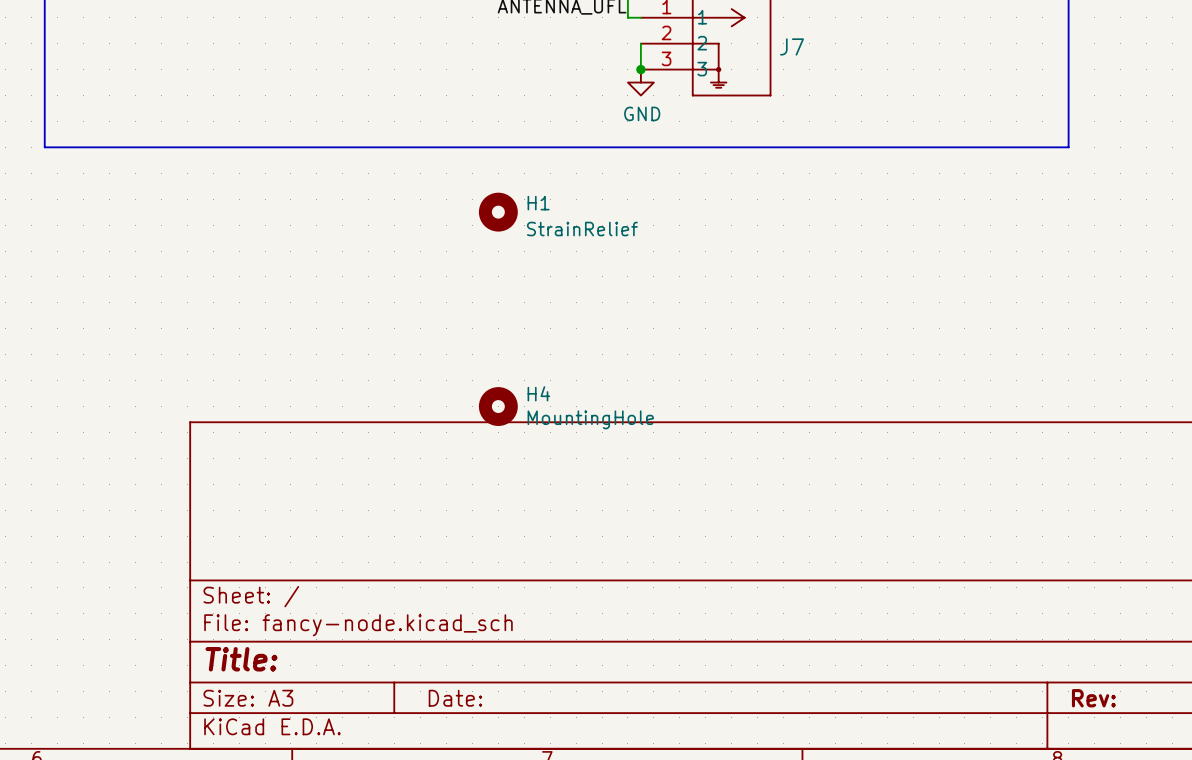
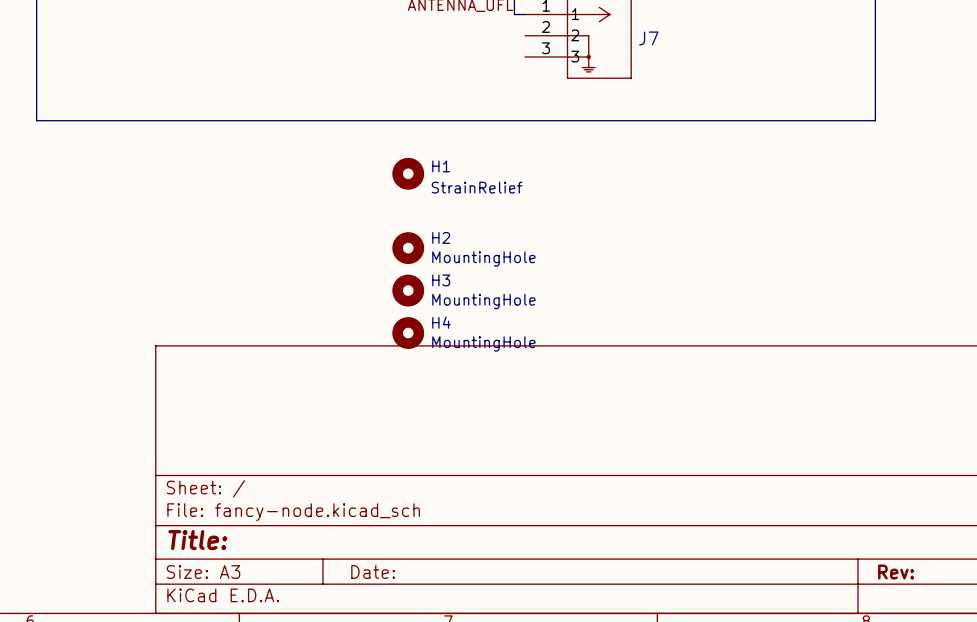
wire: (640, 43) (640, 69) -> none
junction: (640, 69) -> none
power symbol: GND (640, 82) -> none
H2: none -> MountingHole (408, 248)
H3: none -> MountingHole (408, 290)

